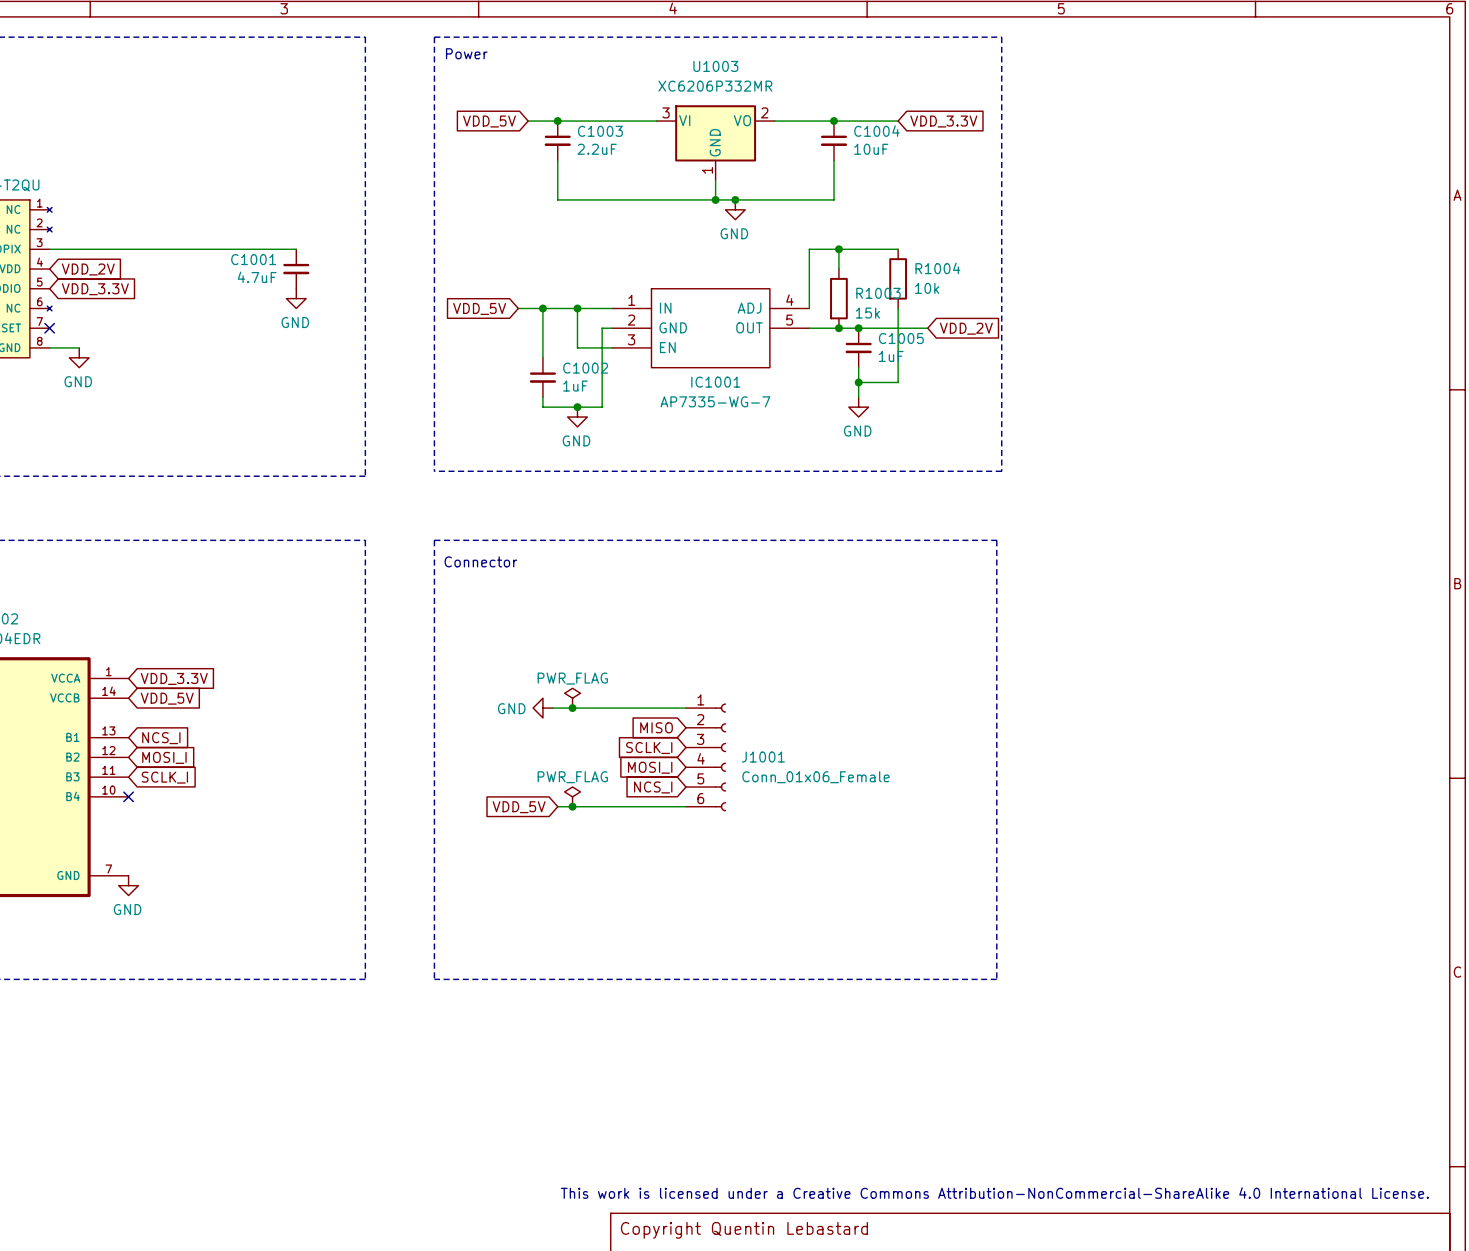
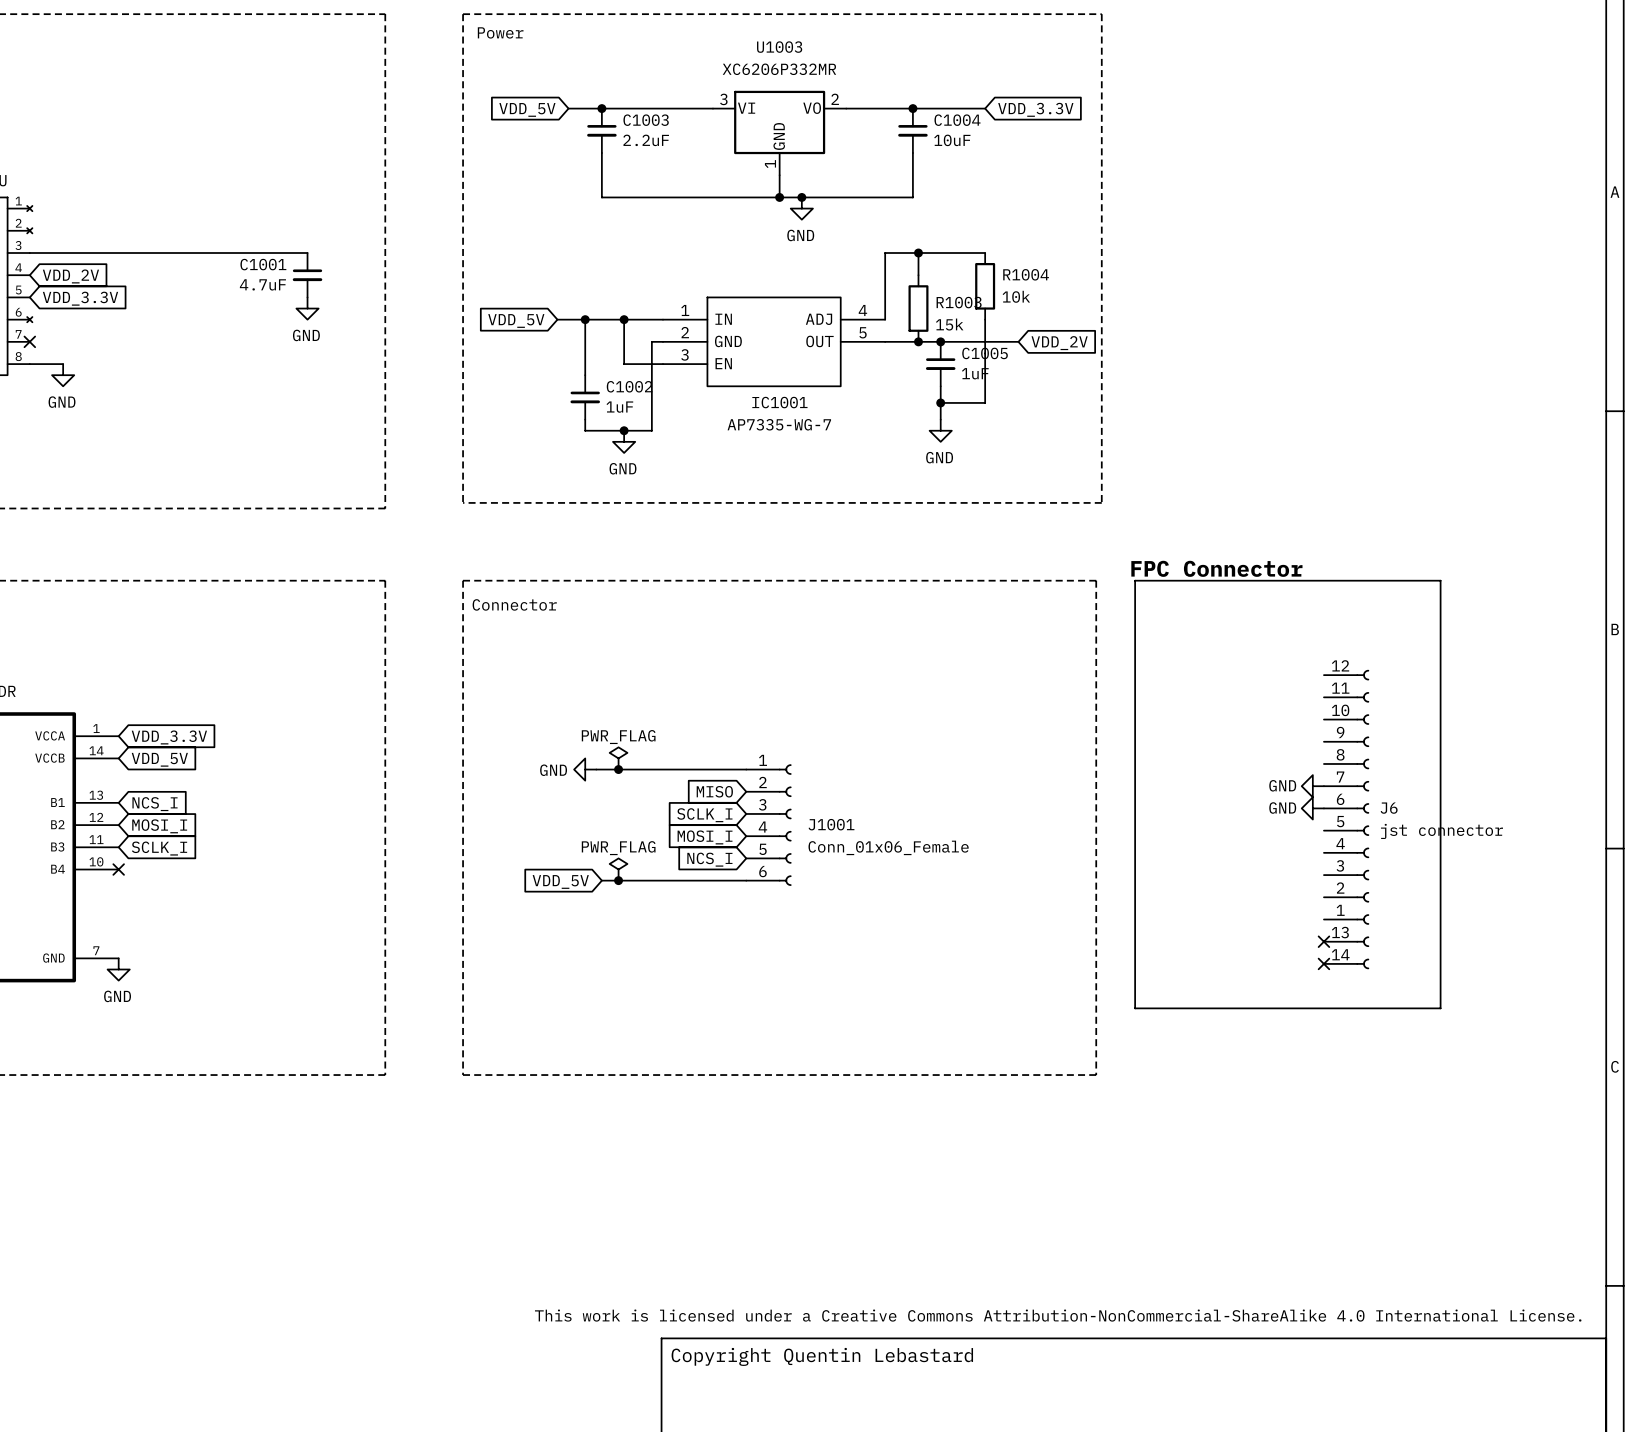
text: none -> FPC Connector (1216, 568)
line: none -> (1135, 580) (1440, 580) (1440, 1008) (1135, 1008) (1135, 580)
power symbol: none -> GND (1312, 786)
power symbol: none -> GND (1312, 808)
J6: none -> jst connector (1346, 819)
no-connect mark: none -> (1323, 941)
no-connect mark: none -> (1323, 963)

